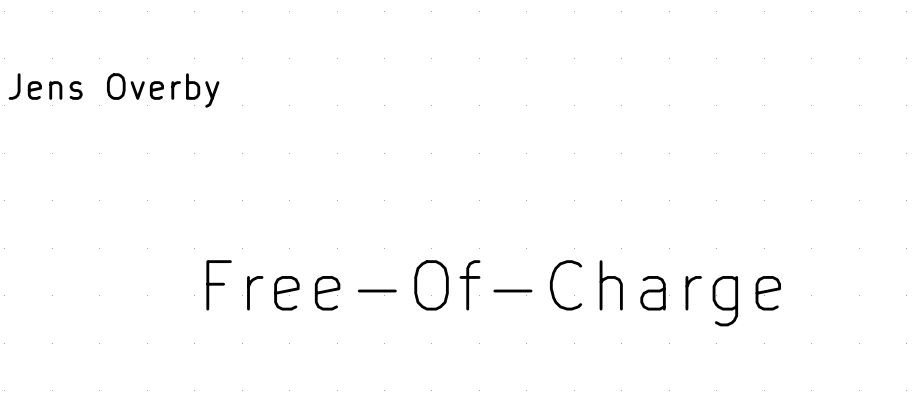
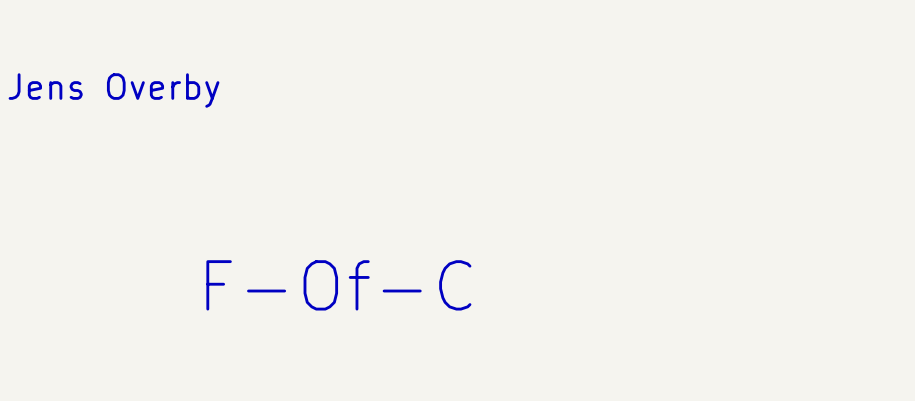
text: Free-Of-Charge (493, 293) -> F-Of-C (338, 285)

